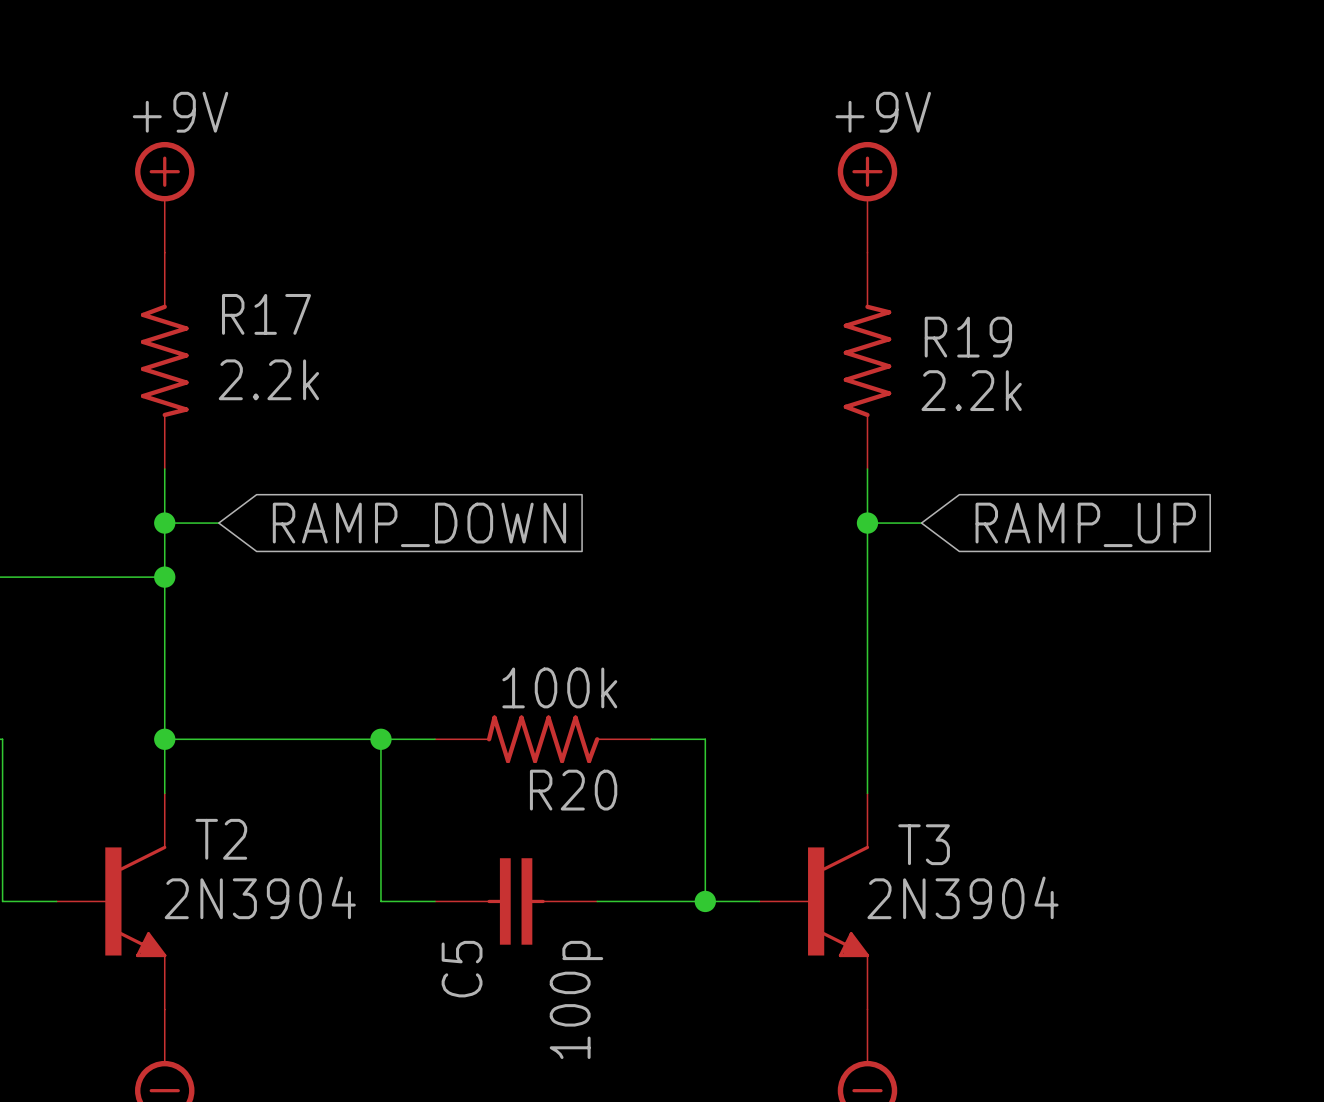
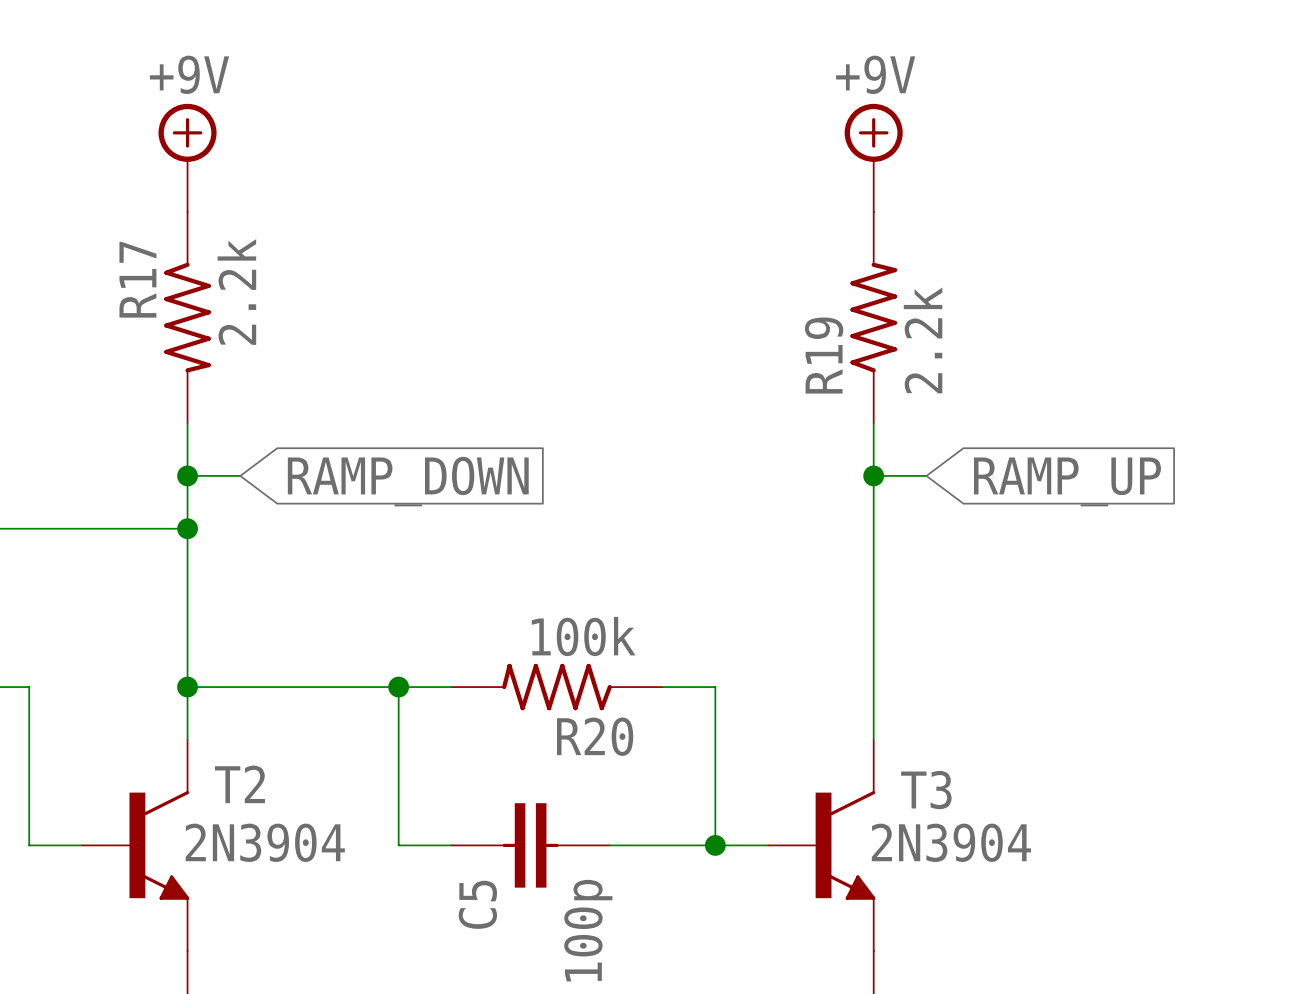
R17 name rotation: 0° (266, 314) -> 90° counterclockwise (137, 279)
R17 name position: R17 (266, 314) -> R17 (137, 279)
R19 name rotation: 0° (968, 337) -> 90° counterclockwise (824, 355)
R19 name position: R19 (968, 337) -> R19 (824, 355)
R17 value rotation: 0° (268, 379) -> 90° counterclockwise (236, 292)
R19 value rotation: 0° (971, 390) -> 90° counterclockwise (923, 340)

